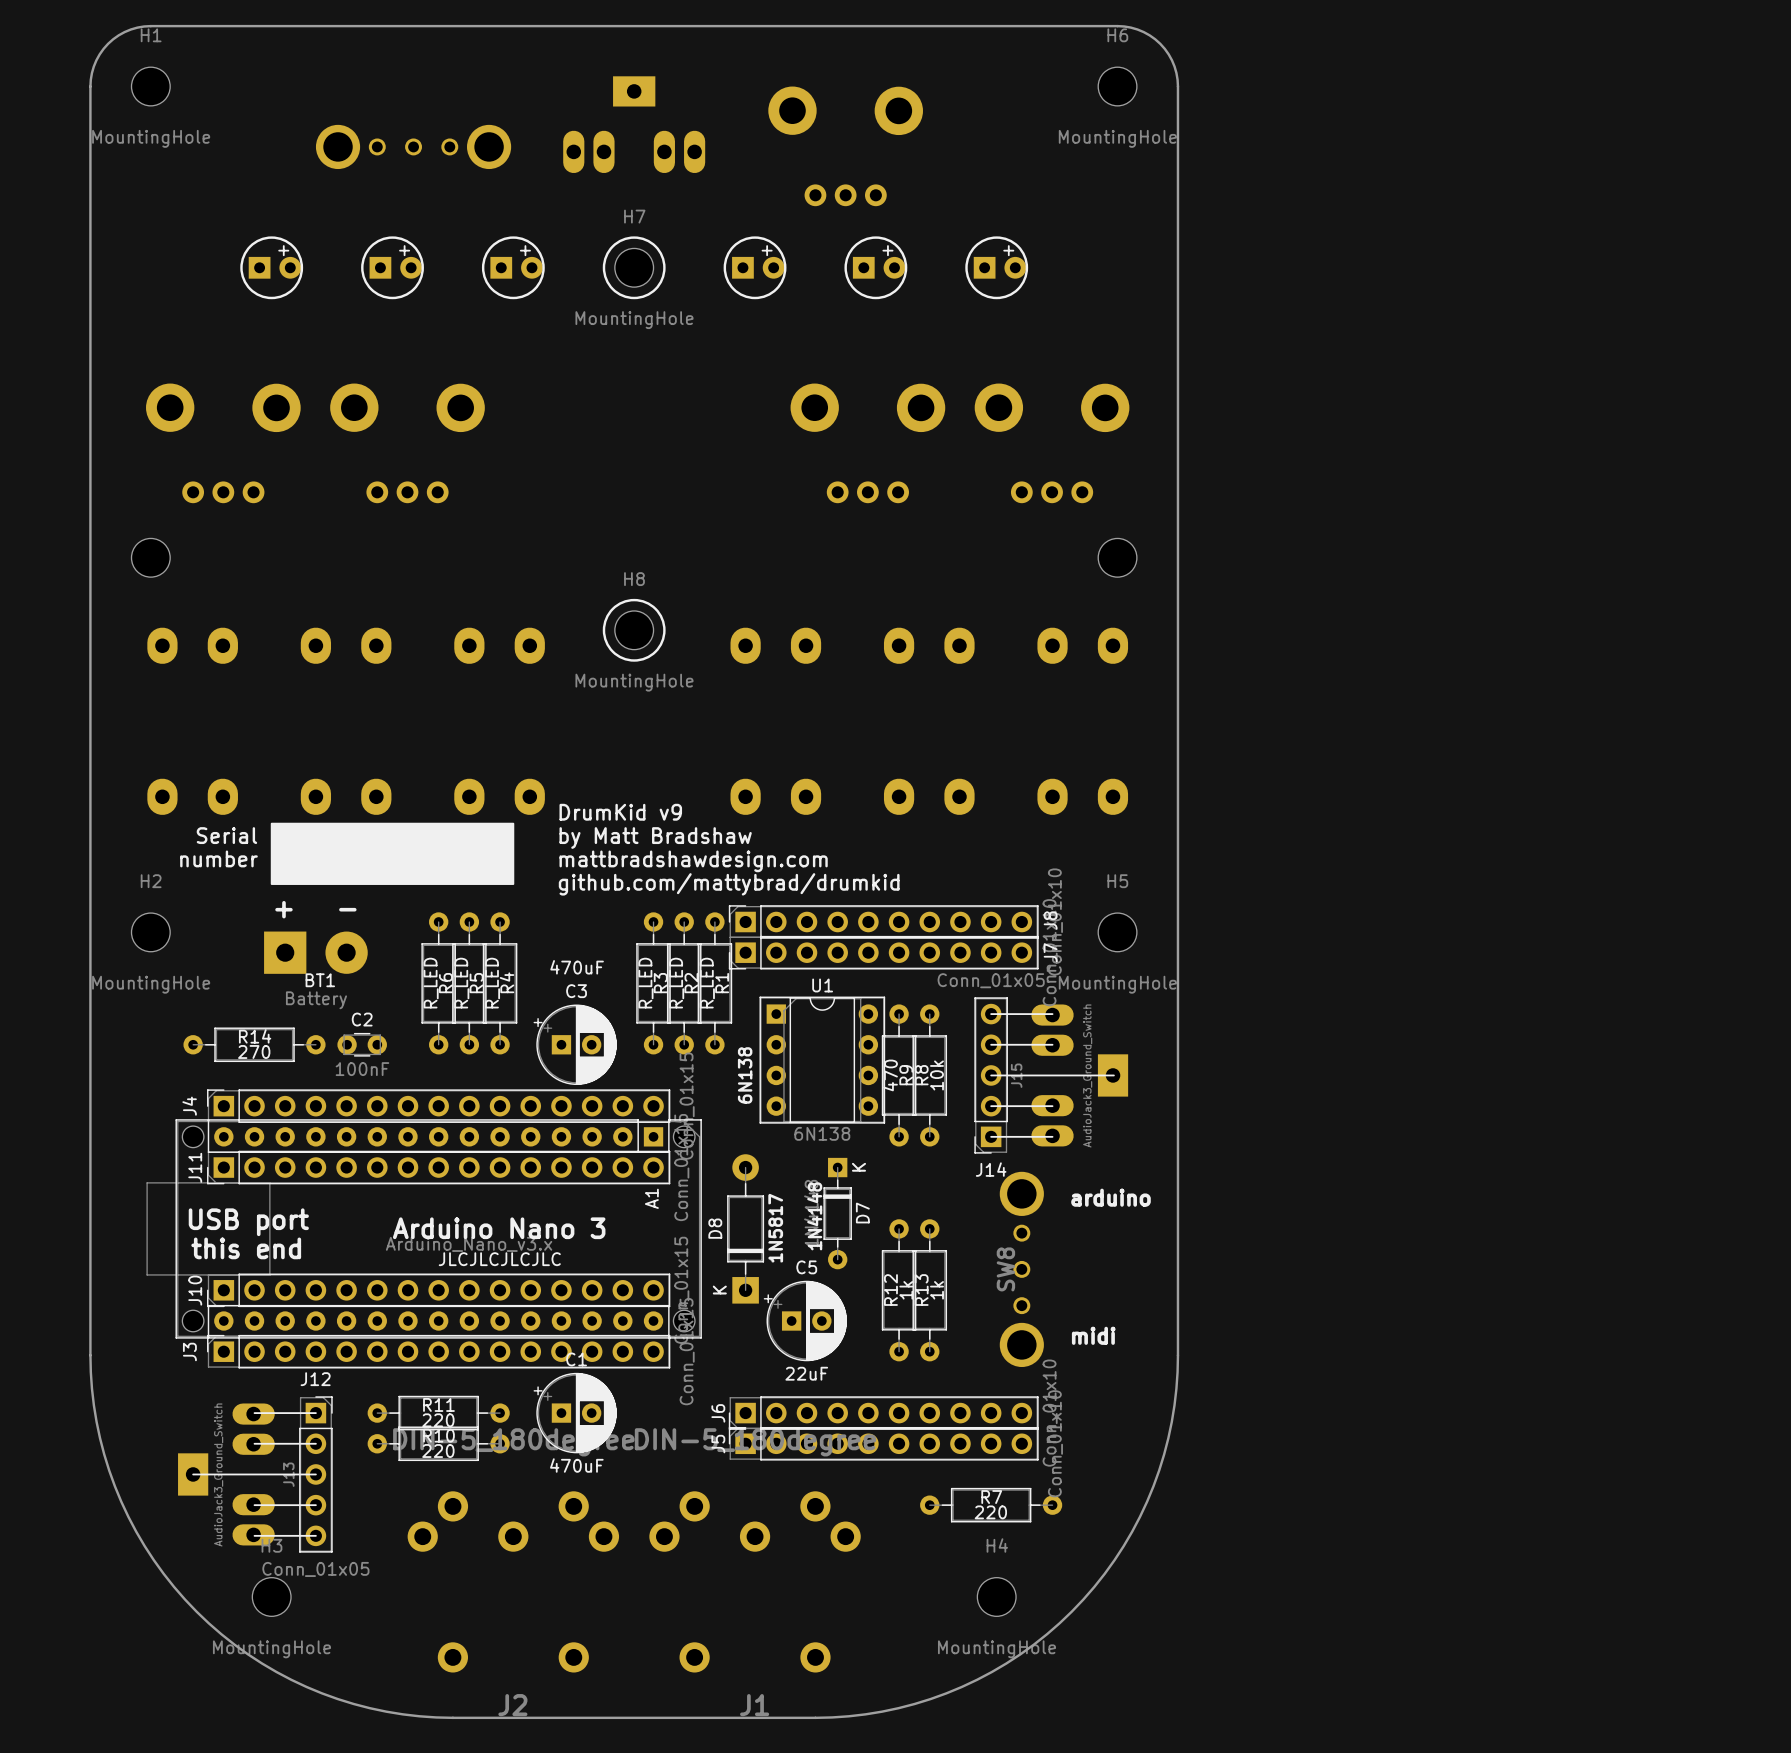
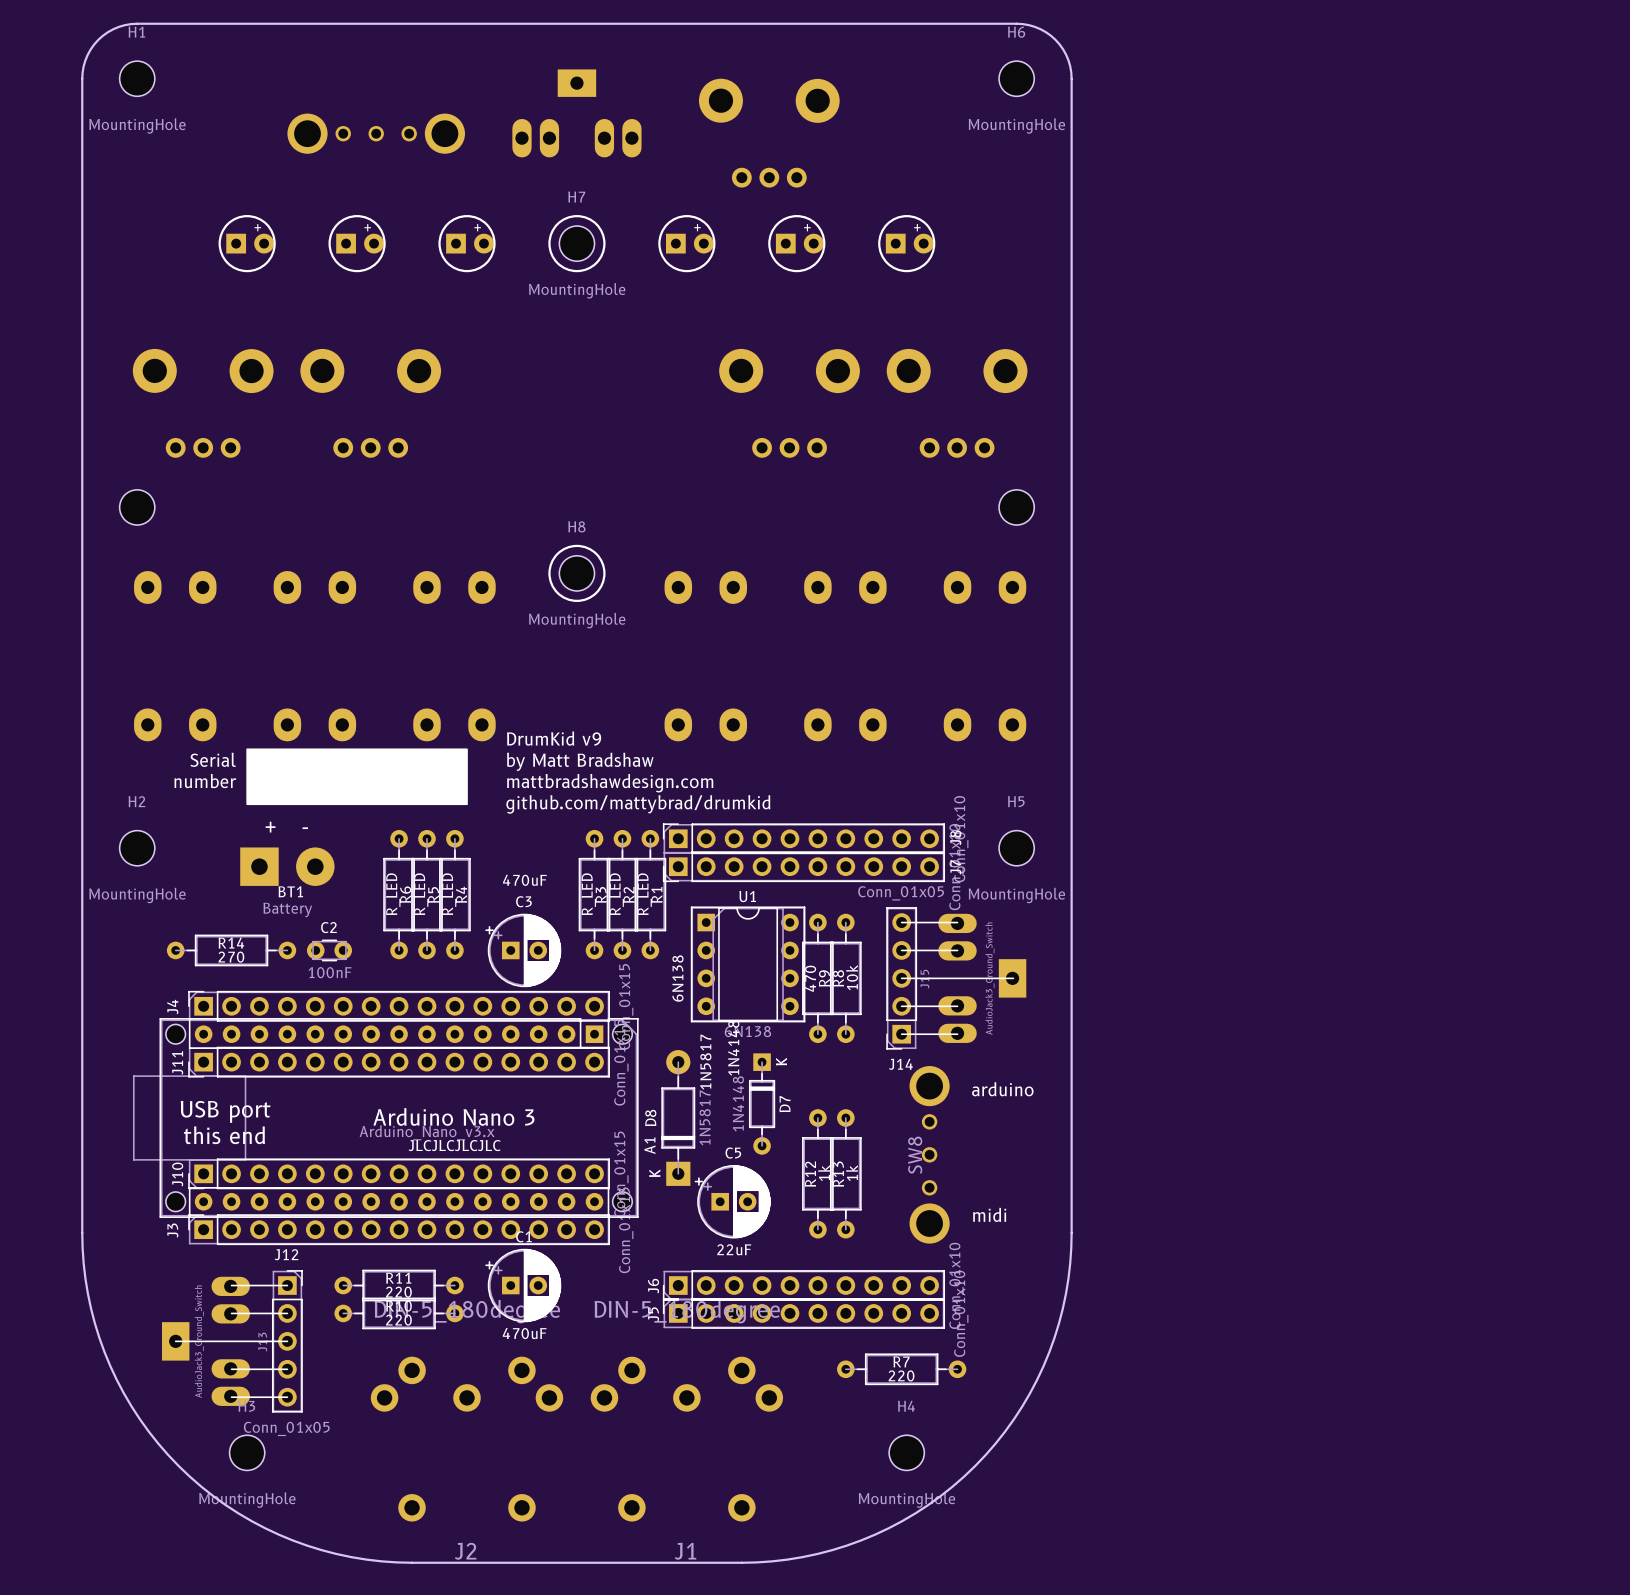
A1 name position: A1 (651, 1198) -> A1 (649, 1145)
text position: 1N4148 (814, 1216) -> 1N4148 (733, 1048)
text position: 1N5817 (775, 1228) -> 1N5817 (705, 1062)

